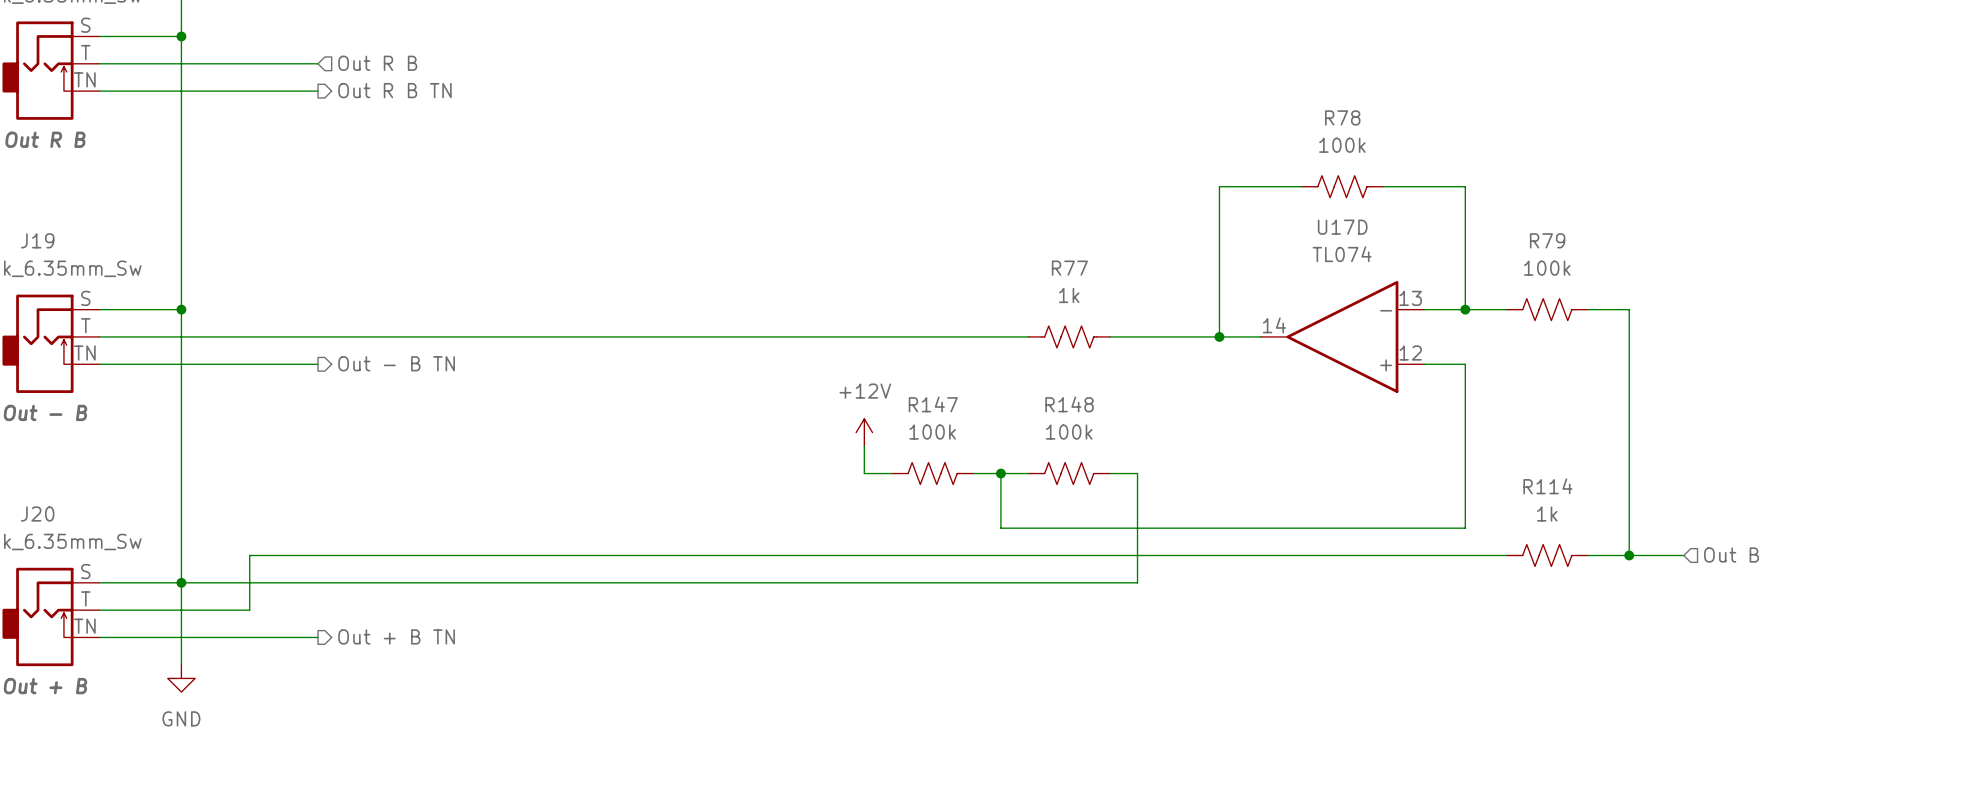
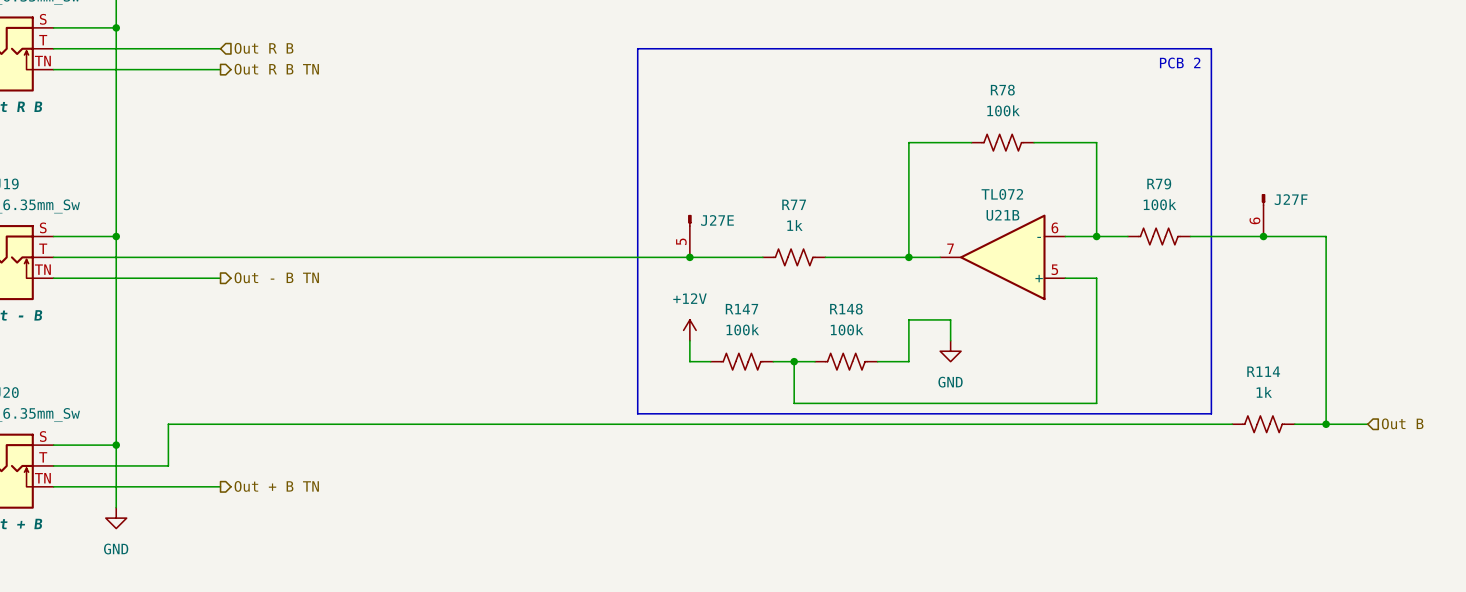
line: none -> (637, 48) (1211, 48) (1211, 413) (637, 413) (637, 48)
text: none -> PCB 2 (1180, 63)
U17D name: U17D (1342, 227) -> U21B (1002, 215)
U17D value: TL074 (1342, 254) -> TL072 (1002, 194)
J27F: none -> (1263, 215)
U17D pin number: 13 (1410, 298) -> 6 (1054, 227)
J27E: none -> (689, 236)
wire: (1629, 309) (1629, 555) -> (1221, 236) (1326, 236) (1326, 424)
junction: none -> (1263, 236)
U17D pin number: 14 (1274, 325) -> 7 (950, 248)
junction: none -> (689, 257)
U17D pin number: 12 (1410, 353) -> 5 (1054, 269)
power symbol position: +12V (864, 432) -> +12V (689, 330)
wire: (864, 446) (864, 473) (891, 473) -> (689, 340) (689, 361) (710, 361)
wire: none -> (950, 340) (950, 319) (908, 319) (908, 361) (877, 361)
power symbol: none -> GND (950, 351)
R147 position: (932, 473) -> (742, 361)
wire: (973, 473) (1028, 473) -> (773, 361) (815, 361)
wire: (1000, 473) (1000, 528) (1069, 528) -> (794, 361) (794, 403)
junction: (1000, 473) -> none
junction: none -> (794, 361)
R148 position: (1069, 473) -> (846, 361)
wire: (1110, 473) (1137, 473) (1137, 582) (181, 582) -> none
hierarchical label position: Out B (1731, 554) -> Out B (1402, 423)
R114 position: (1547, 555) -> (1263, 424)
junction: (1629, 555) -> none
wire: (1642, 555) (1683, 555) -> none
wire: none -> (1294, 424) (1367, 424)
junction: none -> (1326, 424)

